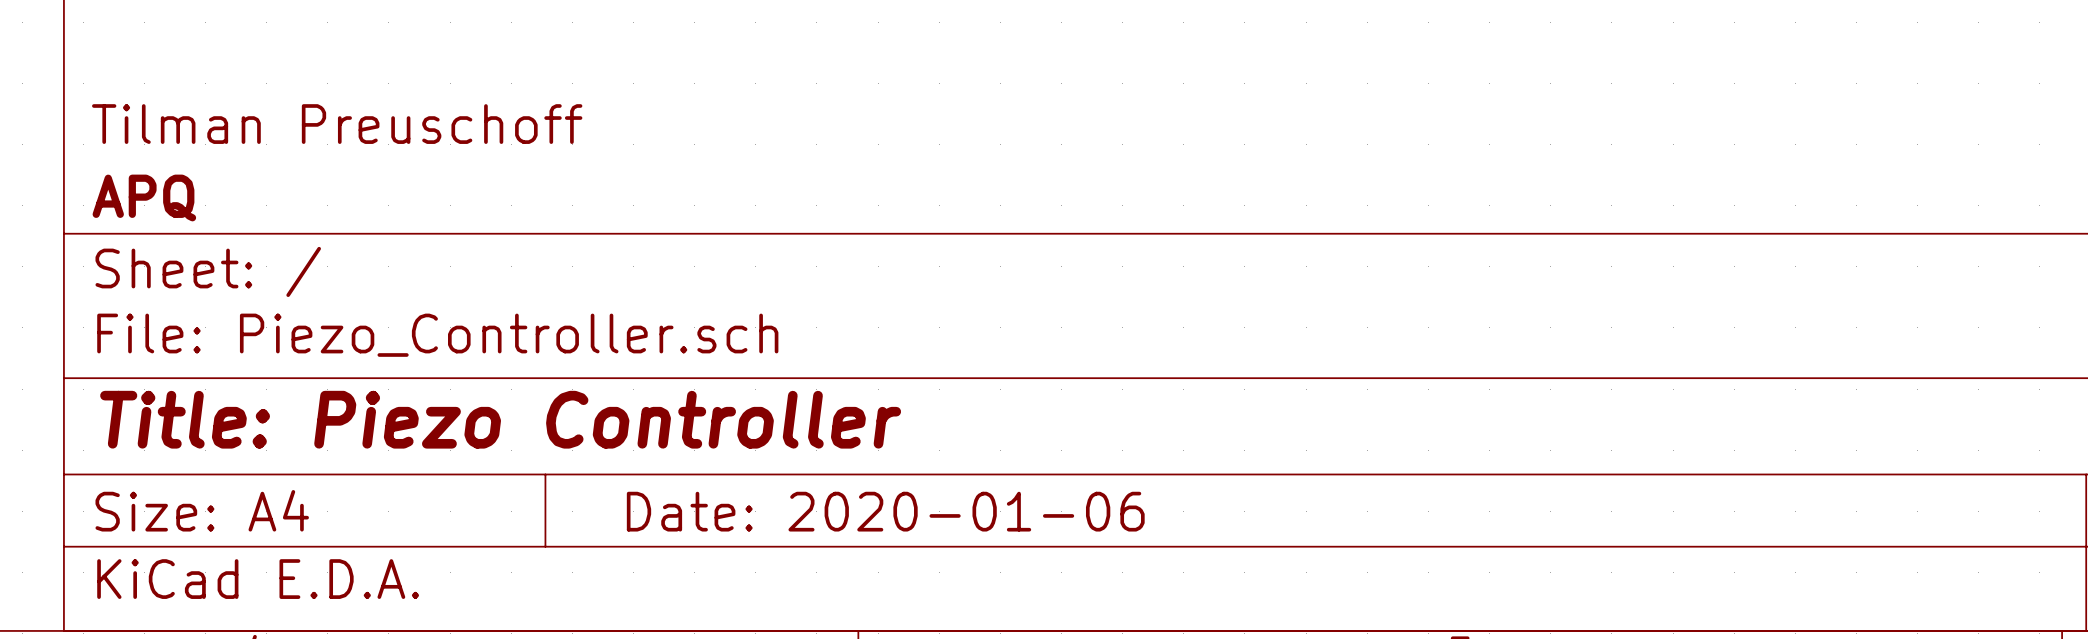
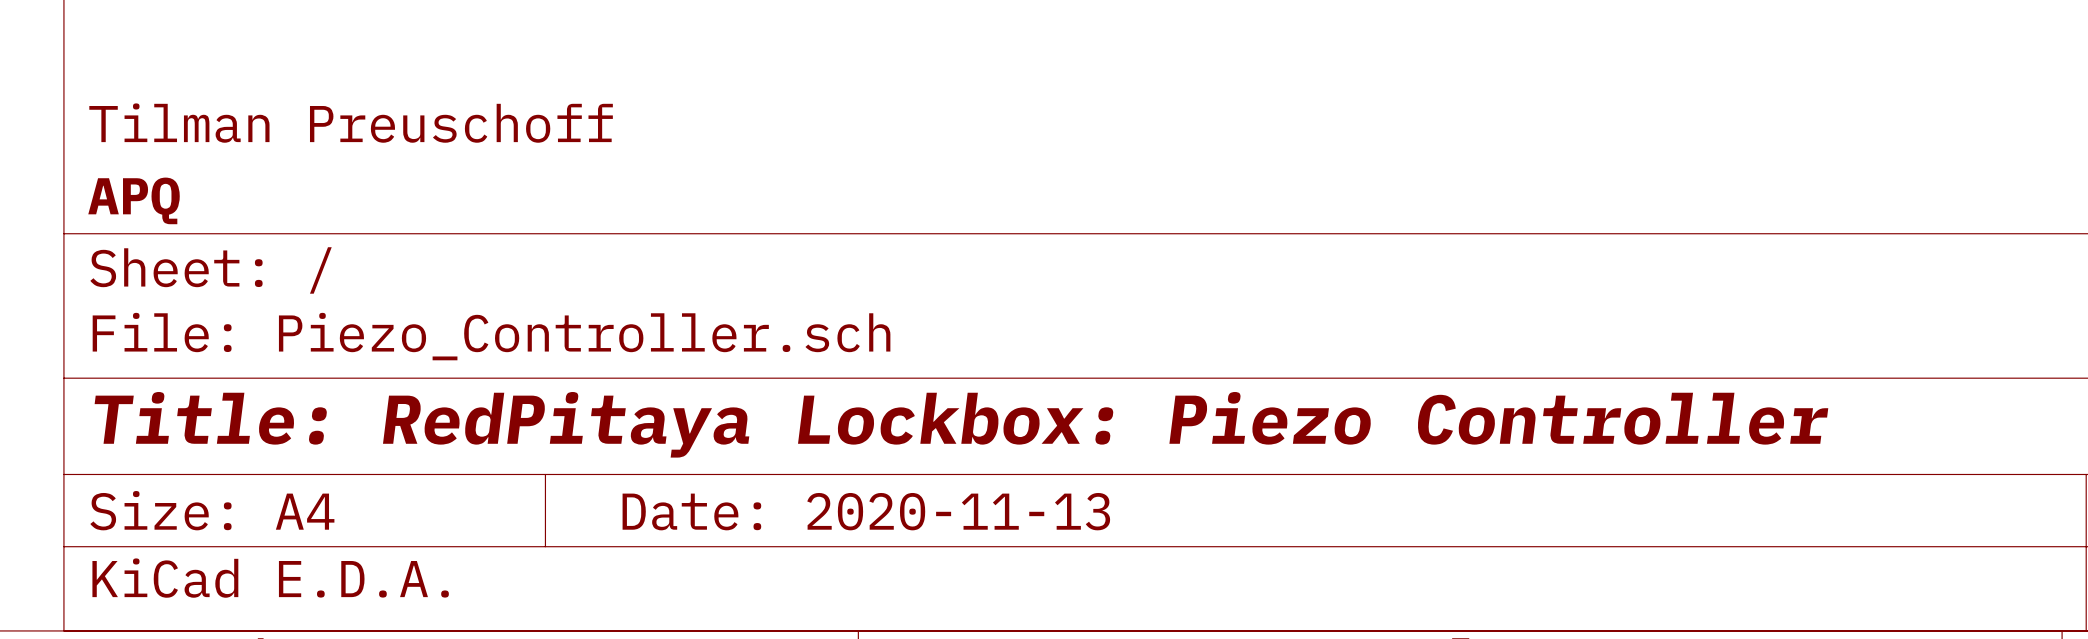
title block: Title: Piezo Controller (500, 419) -> Title: RedPitaya Lockbox: Piezo Controller (961, 424)
title block: Date: 2020-01-06 (885, 511) -> Date: 2020-11-13 (866, 511)

